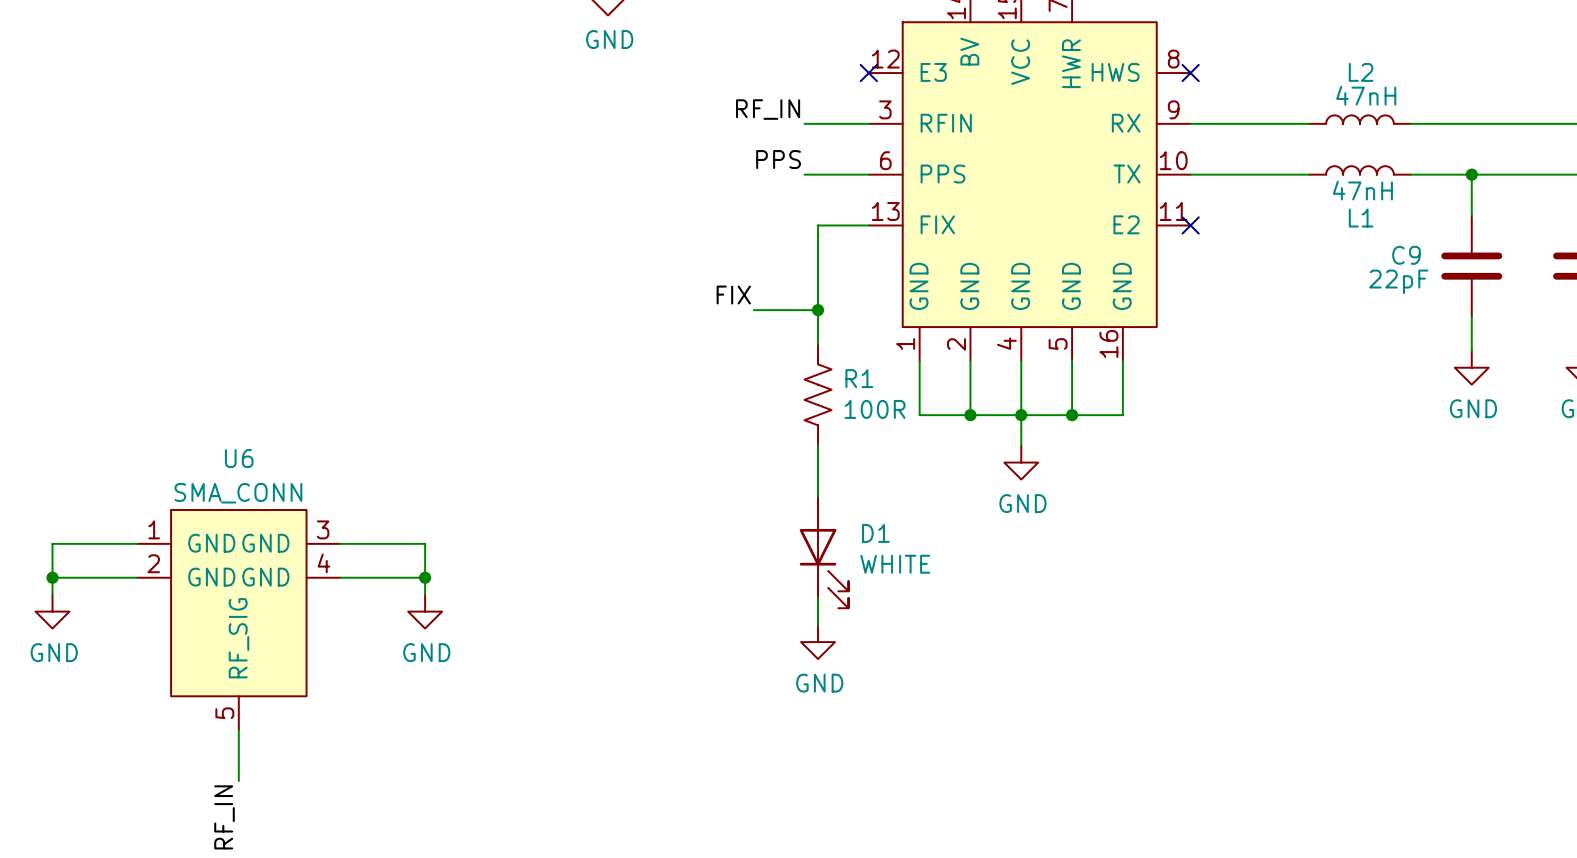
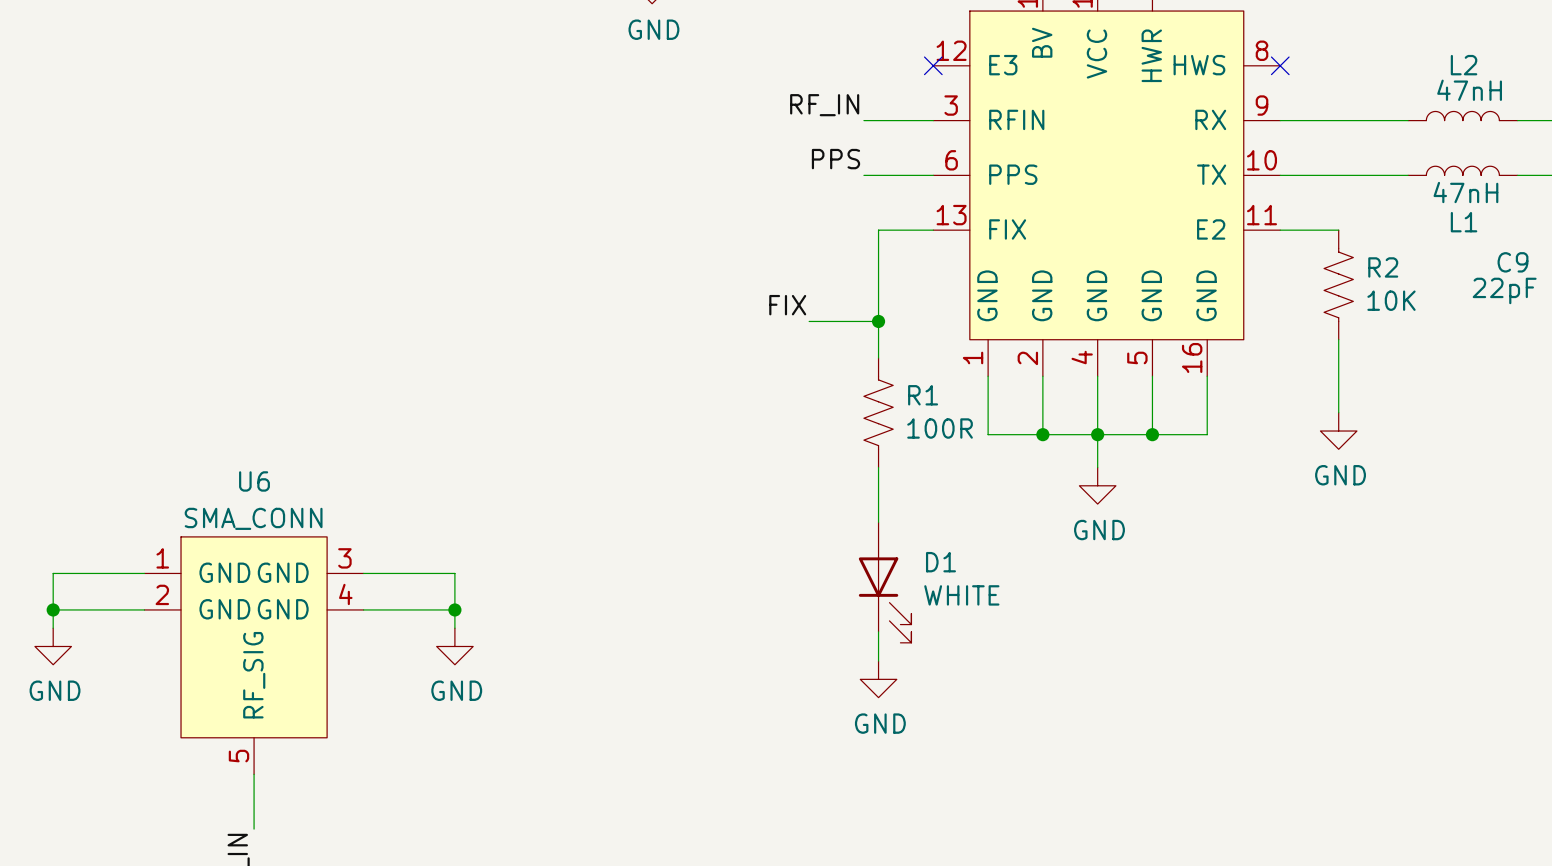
wire: none -> (1280, 230) (1338, 230)
no-connect mark: (1190, 225) -> none
R2: none -> 10K (1338, 284)
wire: none -> (1338, 339) (1338, 412)
power symbol: none -> GND (1338, 431)

